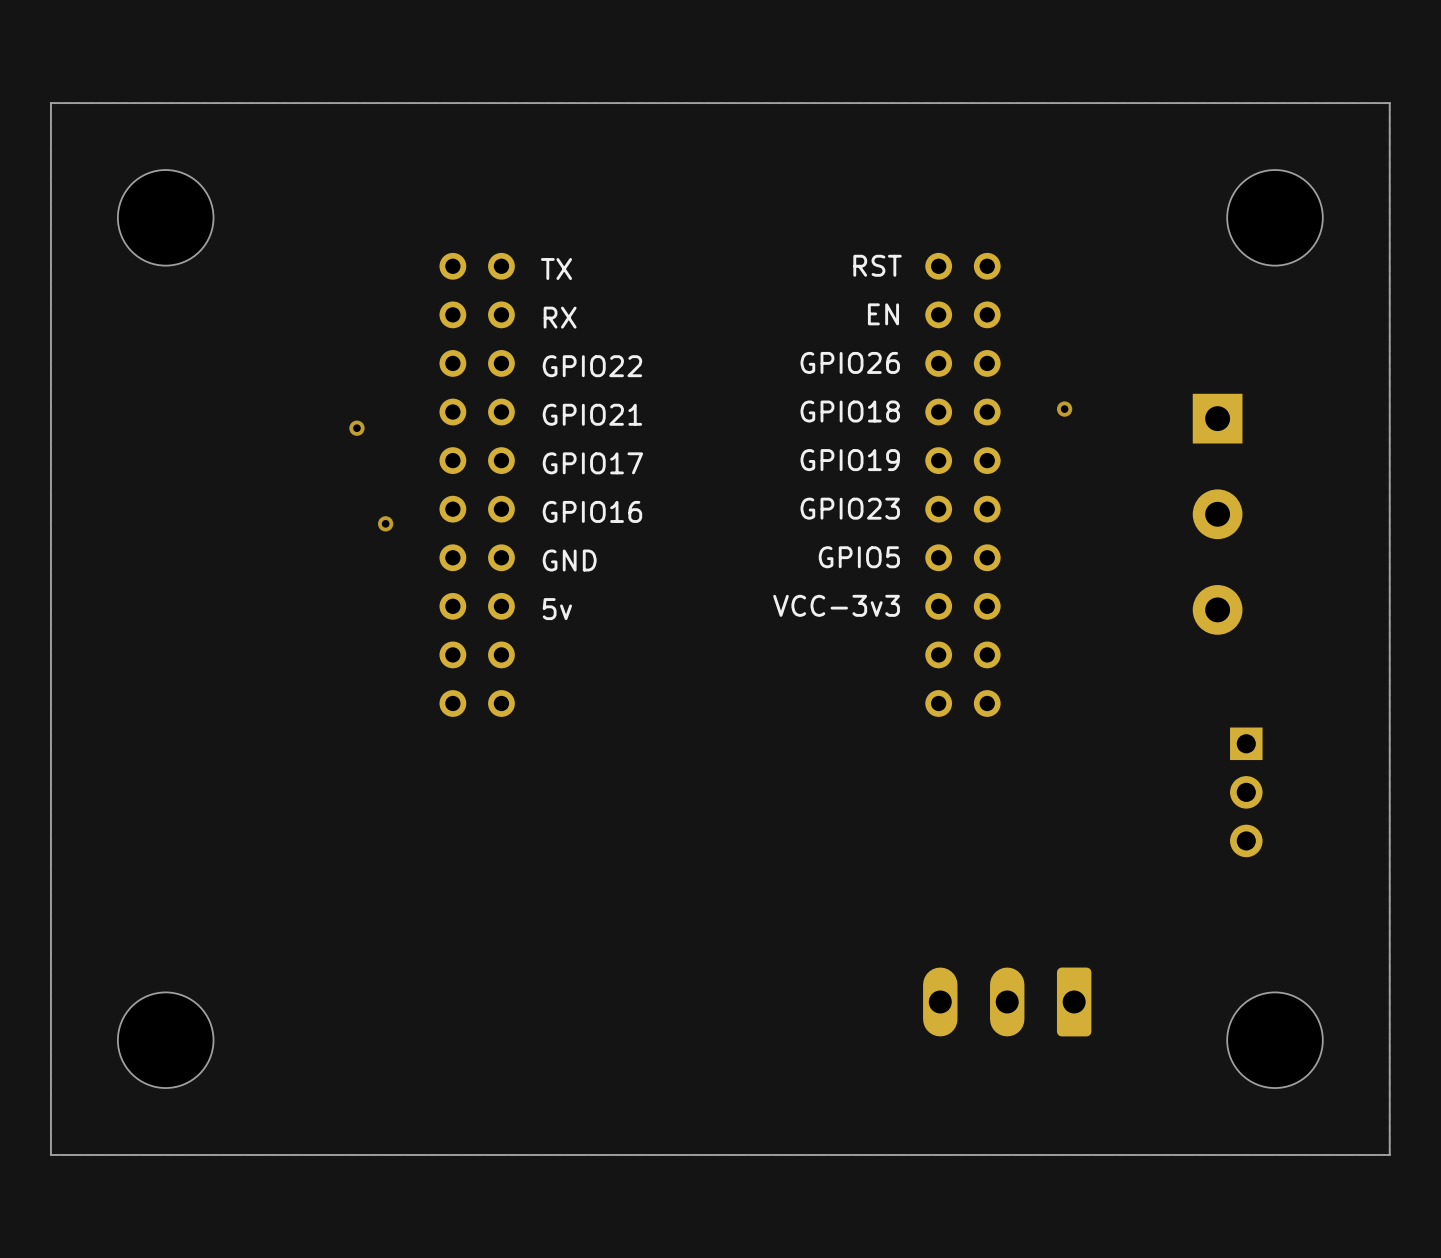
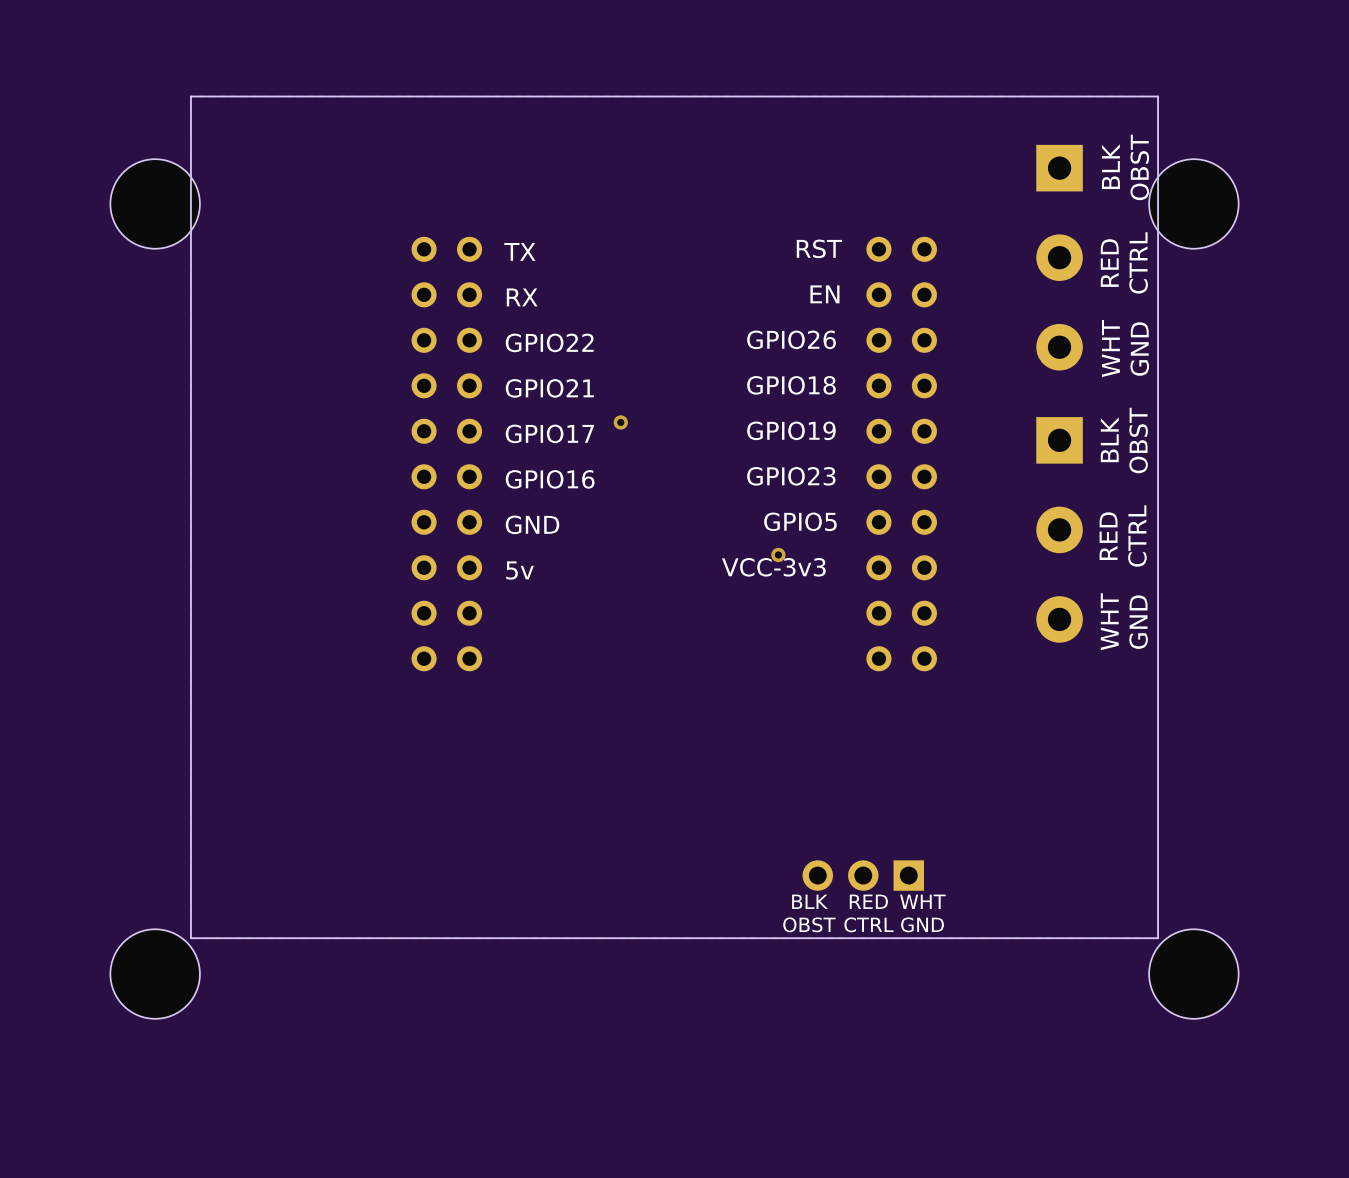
board edge: (1236, 103) (1389, 103) (1389, 1154) (50, 1154) (50, 103) (203, 103) -> (1158, 96) (1158, 938) (190, 938) (190, 96)
text: none -> OBST (1139, 167)
text: none -> BLK (1110, 166)
part: none -> (1059, 257)
text: none -> RED (1109, 263)
text: none -> CTRL (1138, 262)
text: none -> WHT (1110, 348)
text: none -> GND (1139, 349)
via: (1064, 409) -> none
via: (356, 428) -> none
via: none -> (620, 422)
text: none -> BLK (1109, 439)
text: none -> OBST (1138, 440)
part position: (1217, 514) -> (1059, 529)
via: (385, 523) -> none
text: none -> RED (1108, 536)
text: none -> CTRL (1137, 536)
via: none -> (778, 554)
text: none -> WHT (1109, 621)
text: none -> GND (1138, 622)
part rotation: 0° (1246, 792) -> 90° clockwise (863, 875)
part position: (1246, 792) -> (863, 875)
text: none -> BLK (810, 901)
text: none -> RED (868, 901)
text: none -> WHT (922, 901)
text: none -> OBST (809, 924)
text: none -> CTRL (868, 924)
text: none -> GND (922, 924)
part: (1007, 1001) -> none

